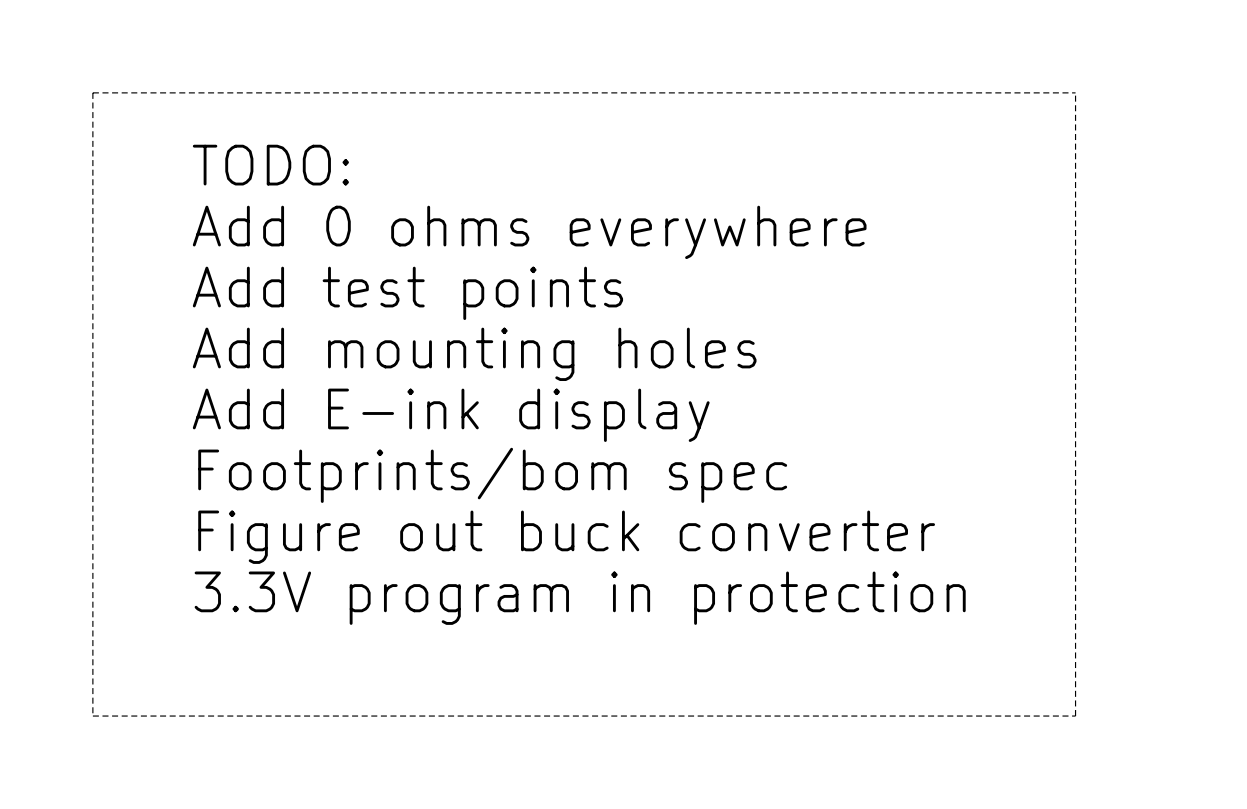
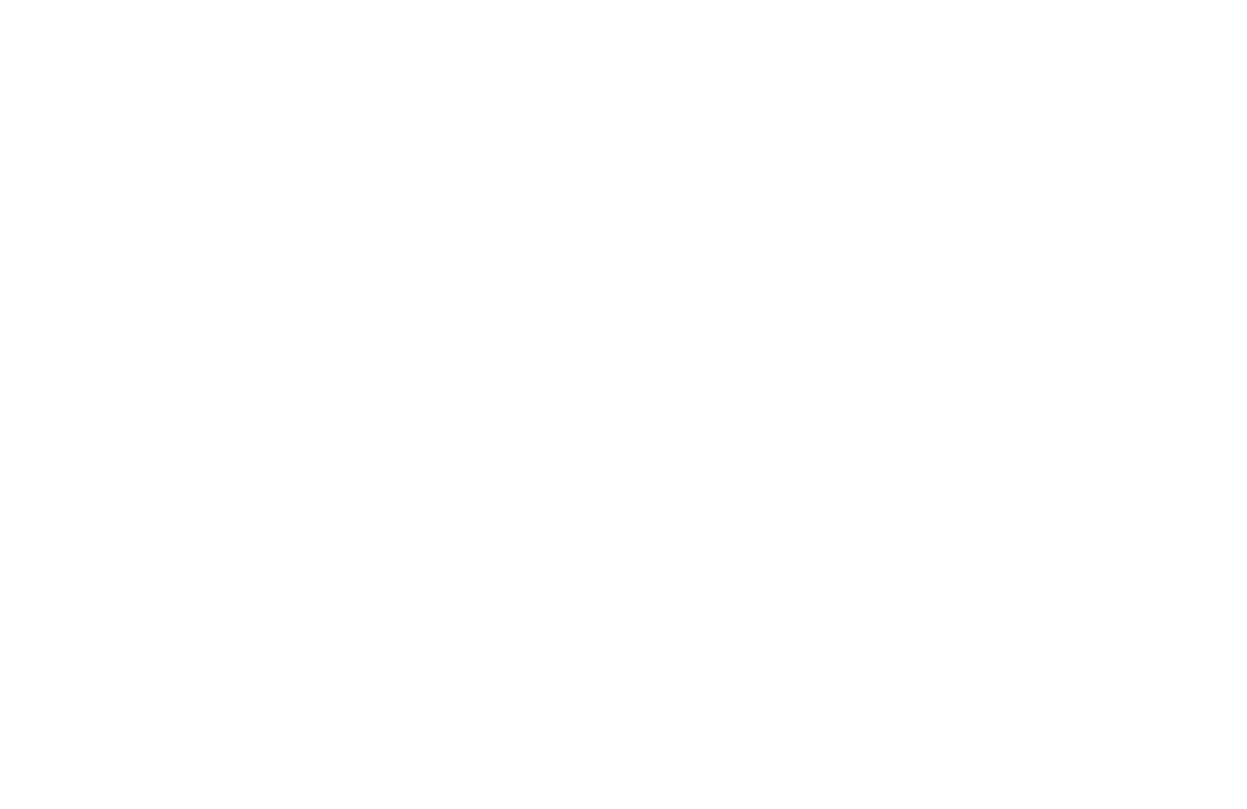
line: (92, 92) (92, 716) (1075, 716) (1075, 92) (92, 92) -> none
text: TODO: (270, 165) -> none
text: Add 0 ohms everywhere (529, 232) -> none
text: Add test points (407, 293) -> none
text: Add mounting holes (474, 354) -> none
text: Add E-ink display (451, 415) -> none
text: Footprints/bom spec (492, 475) -> none
text: Figure out buck converter (566, 537) -> none
text: 3.3V program in protection (580, 598) -> none

